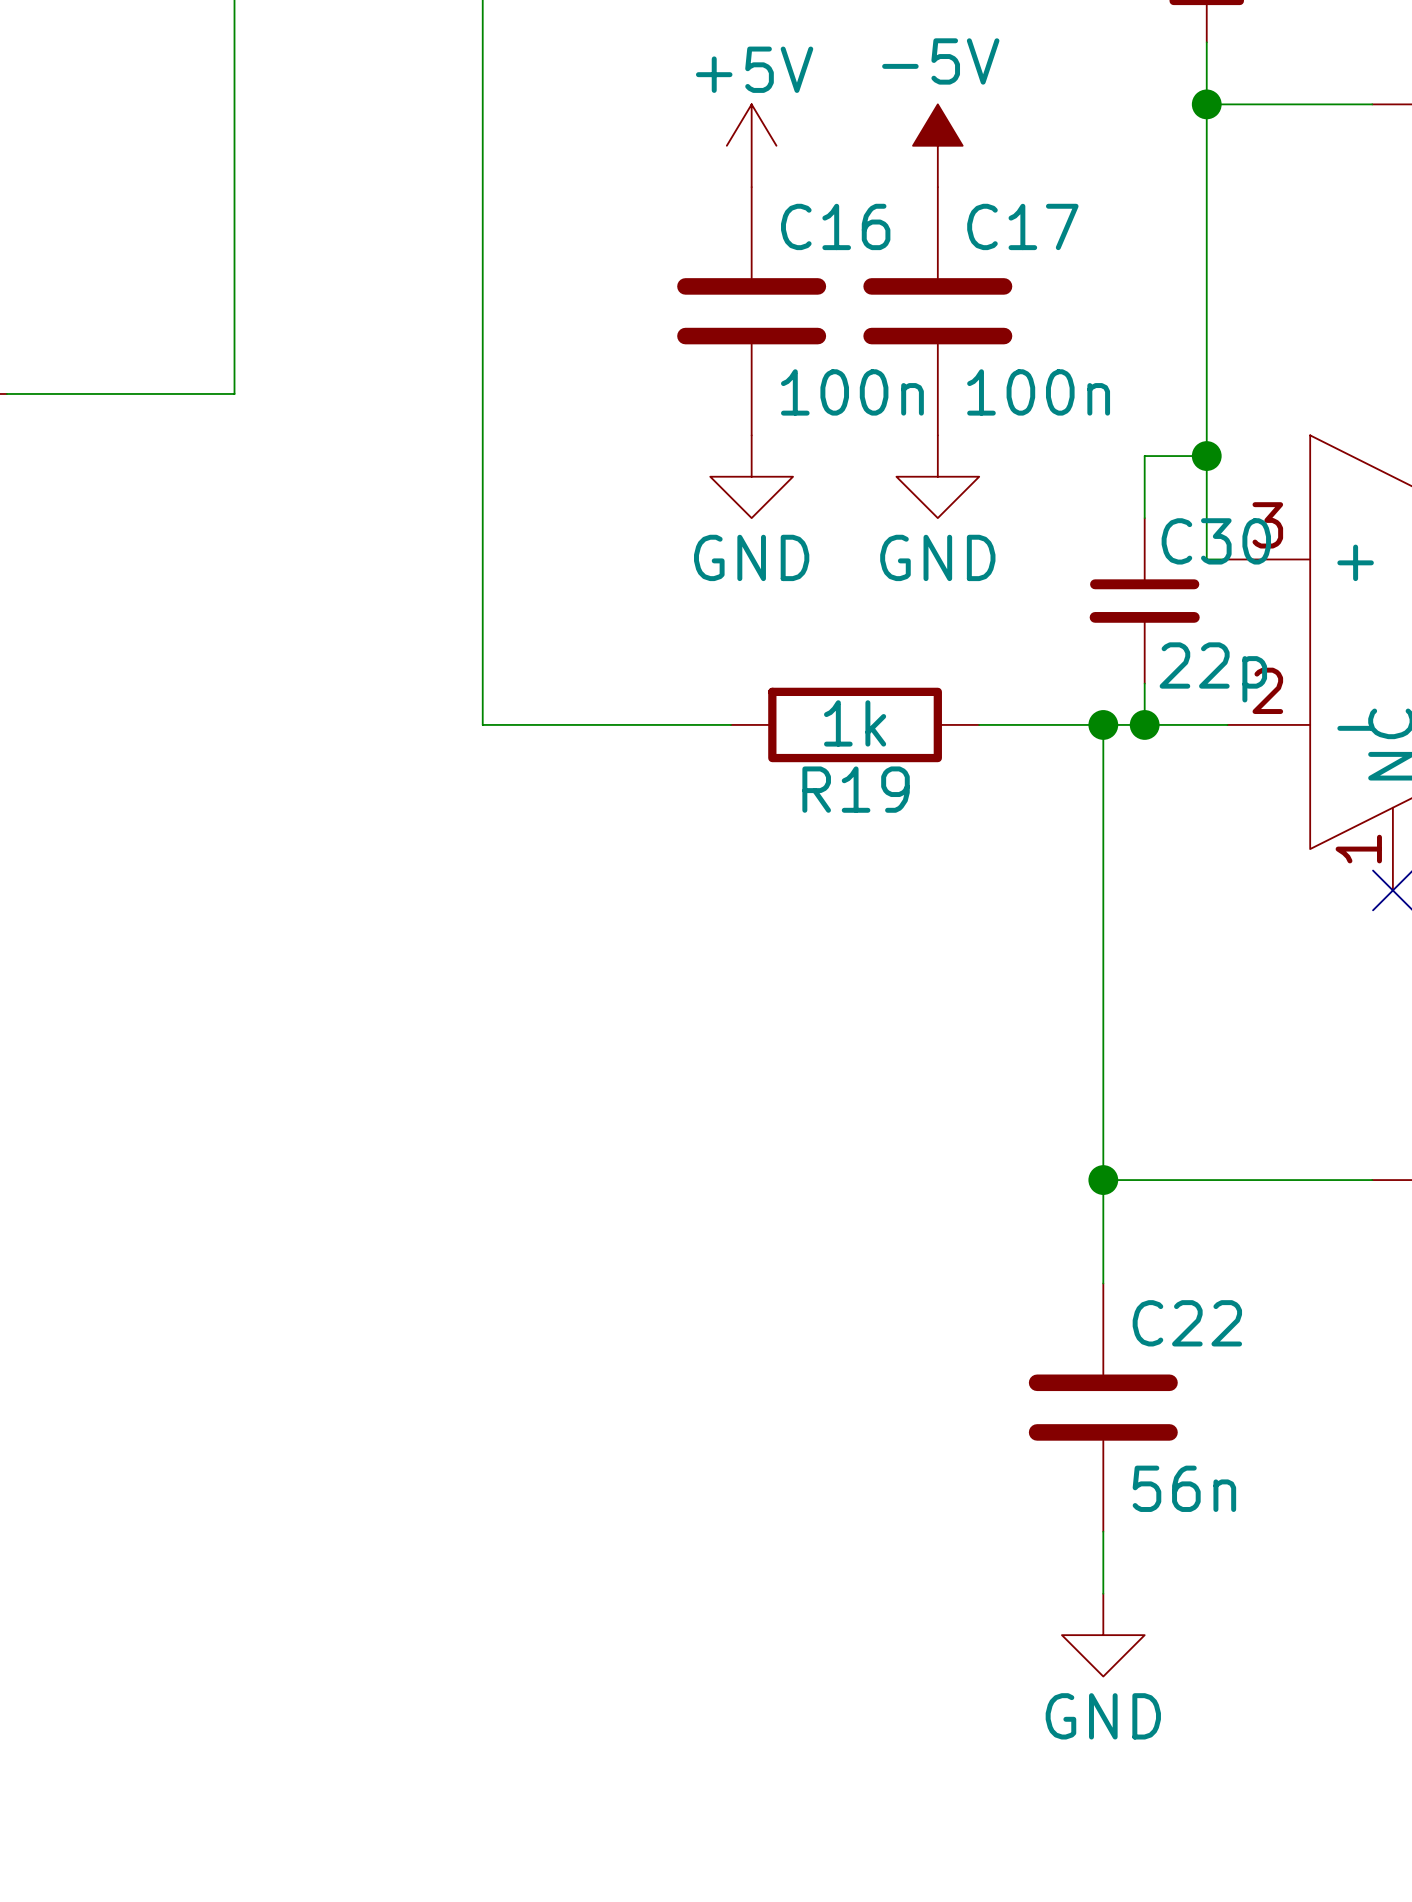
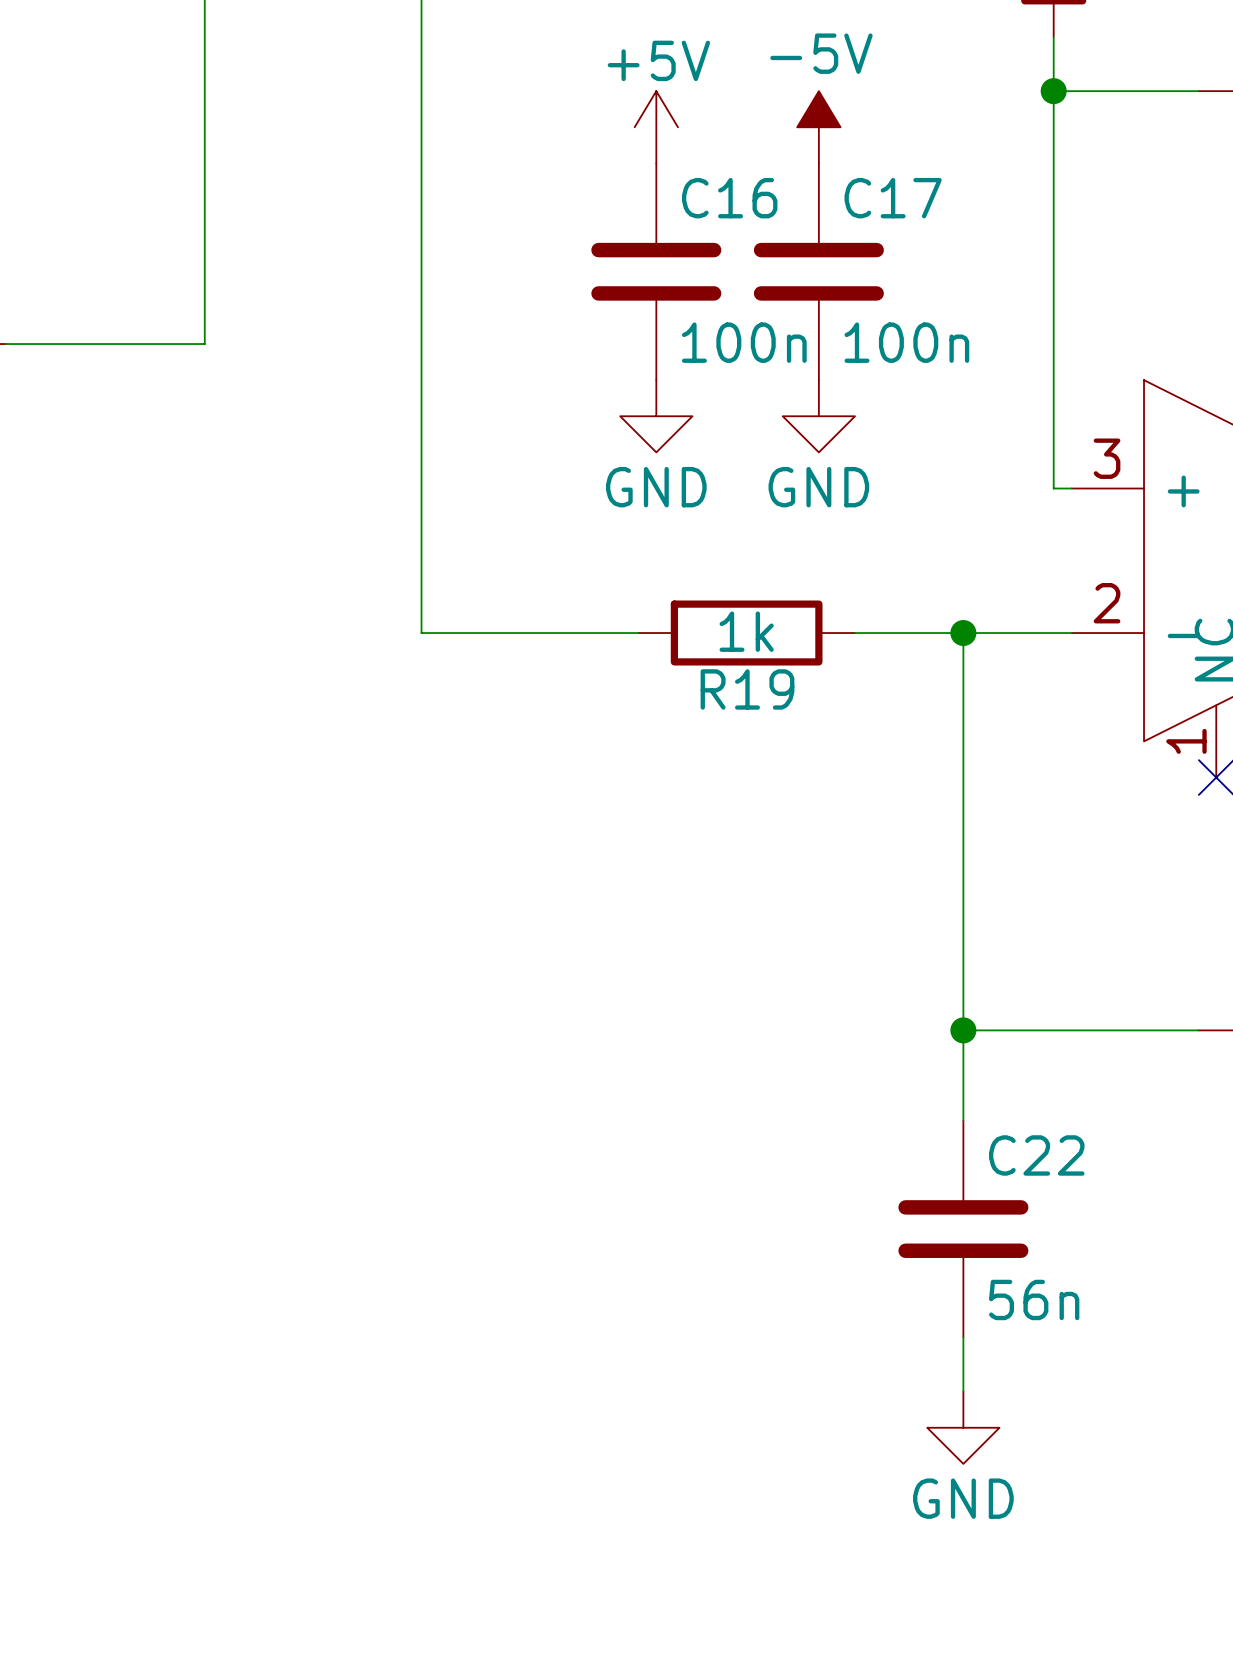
wire: (1206, 456) (1144, 456) (1144, 518) -> none
junction: (1206, 456) -> none
C30: 22p (1144, 600) -> none
wire: (1144, 683) (1144, 724) -> none
junction: (1144, 724) -> none

